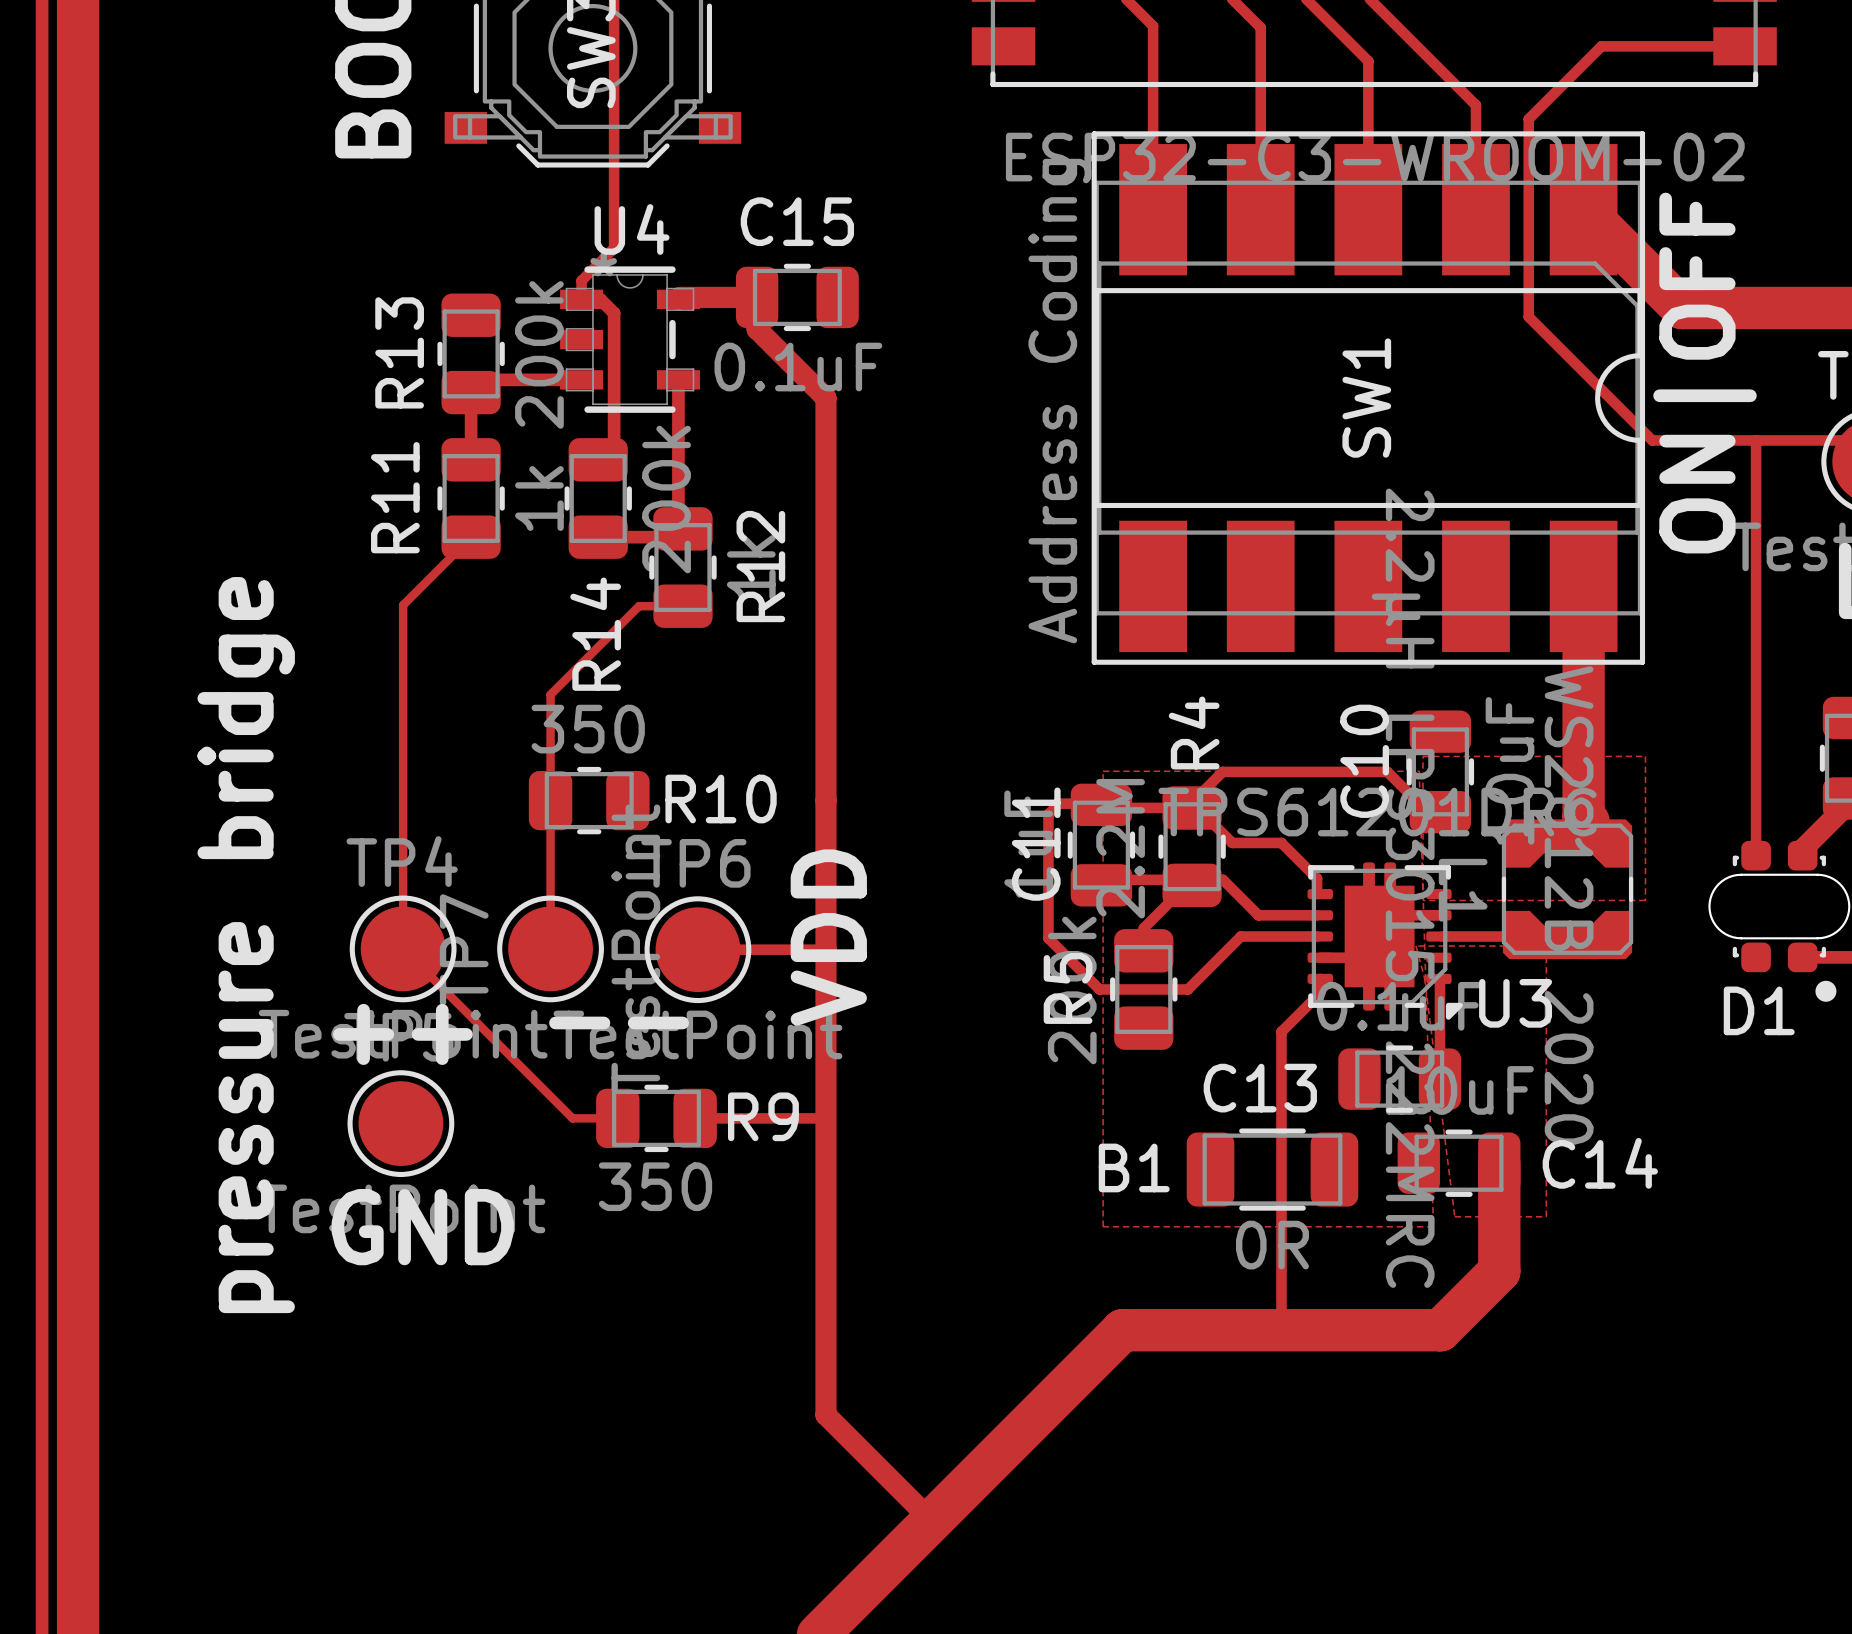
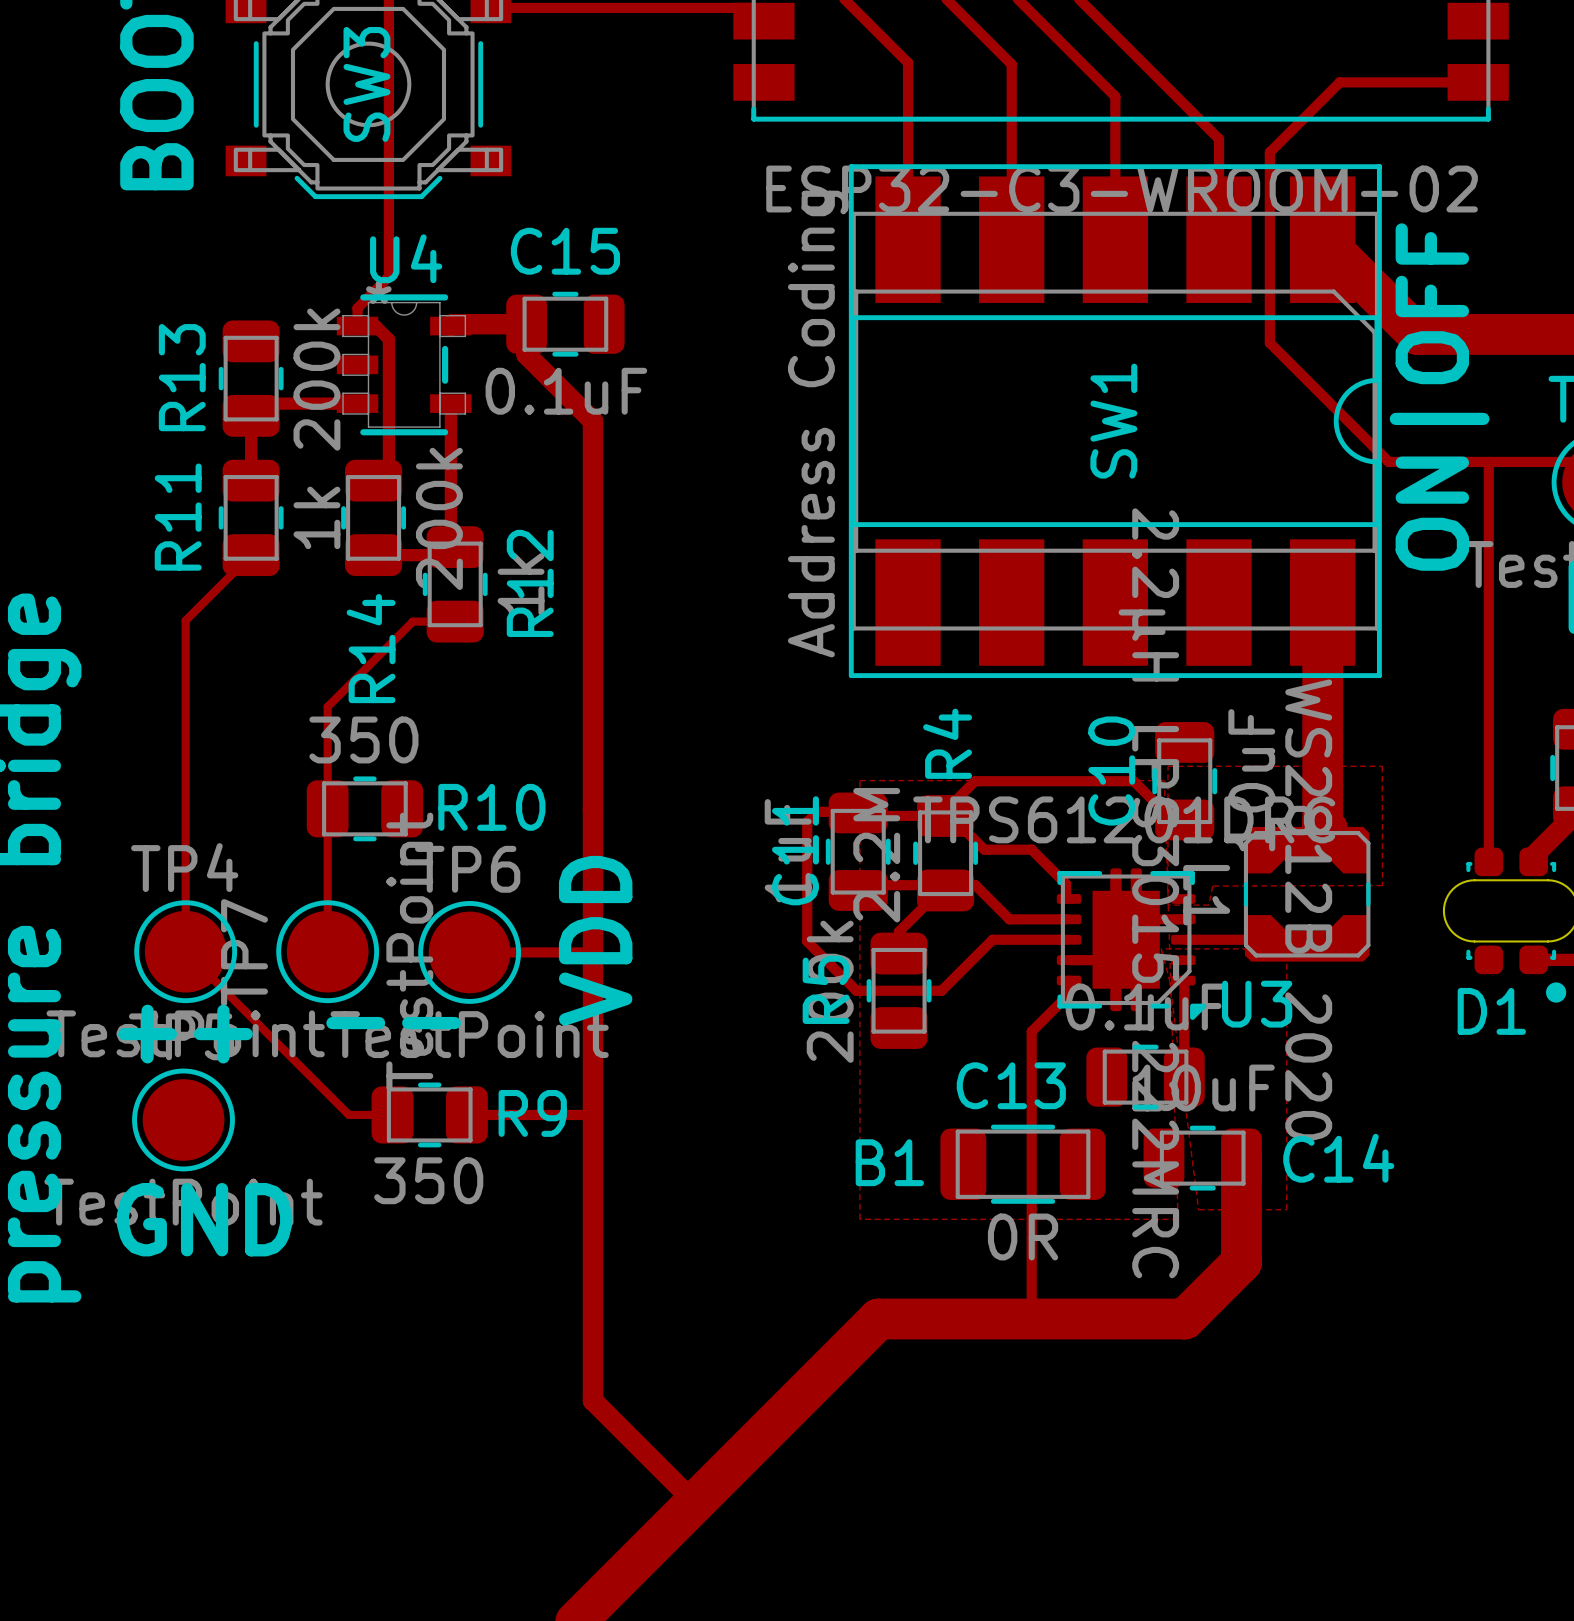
top zone outline: (1645, 756) (1645, 900) (1423, 900) -> (1382, 766) (1382, 885) (1212, 885) (1208, 905) (1168, 905)

